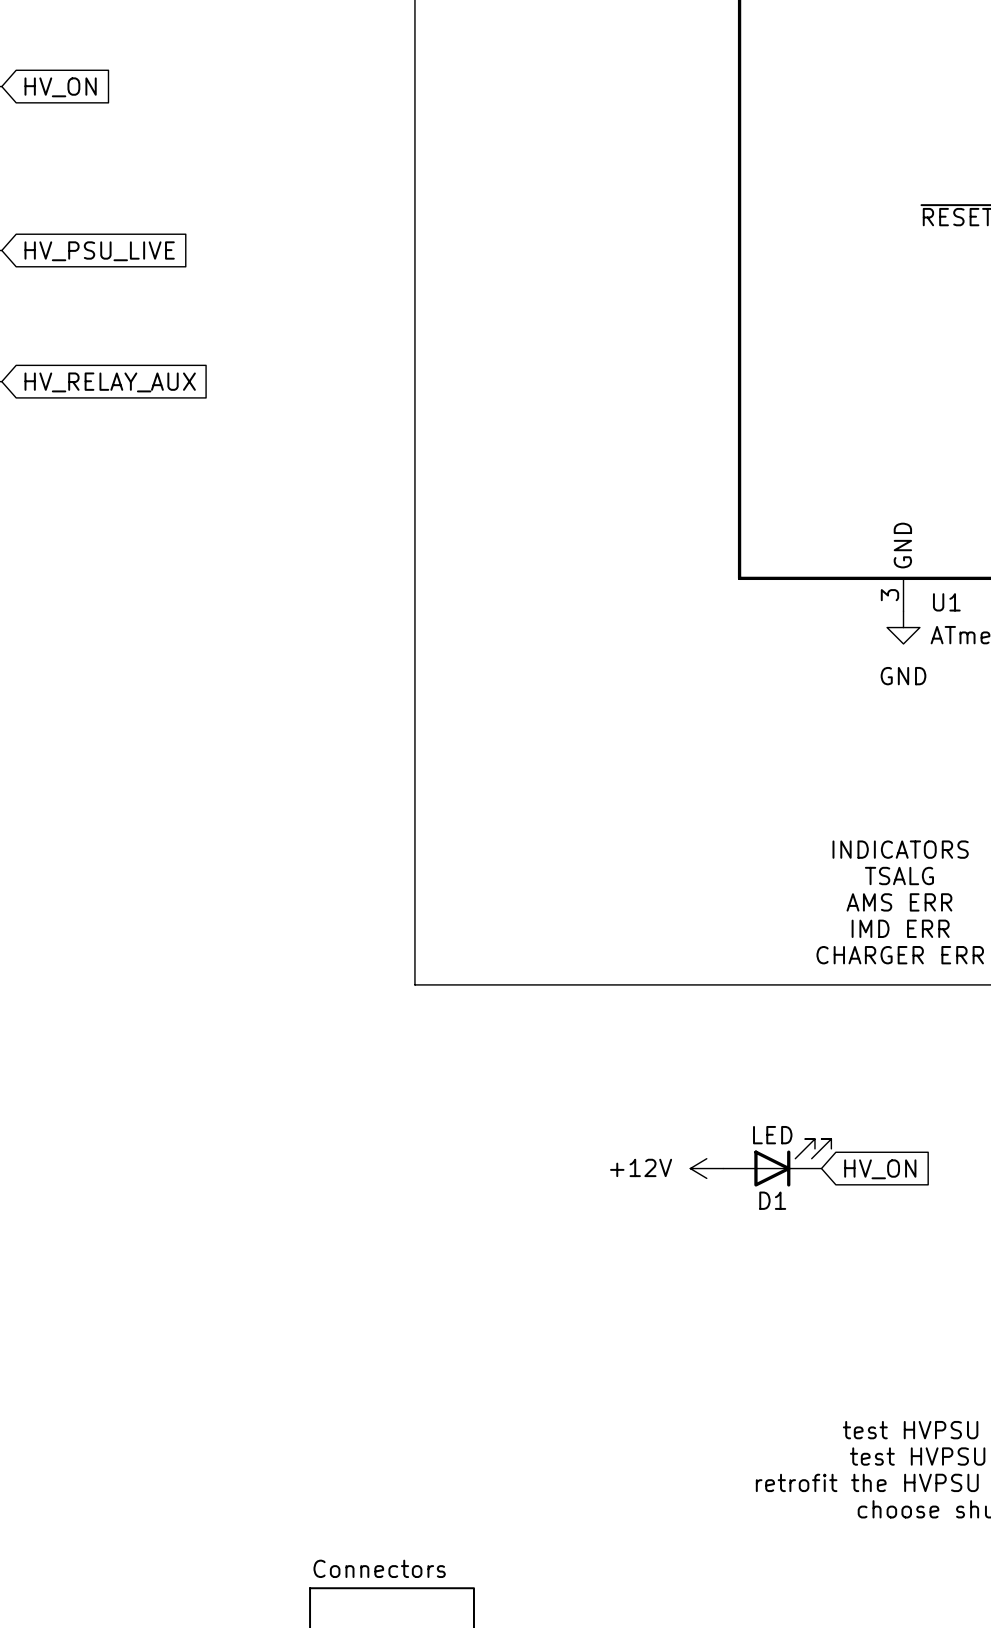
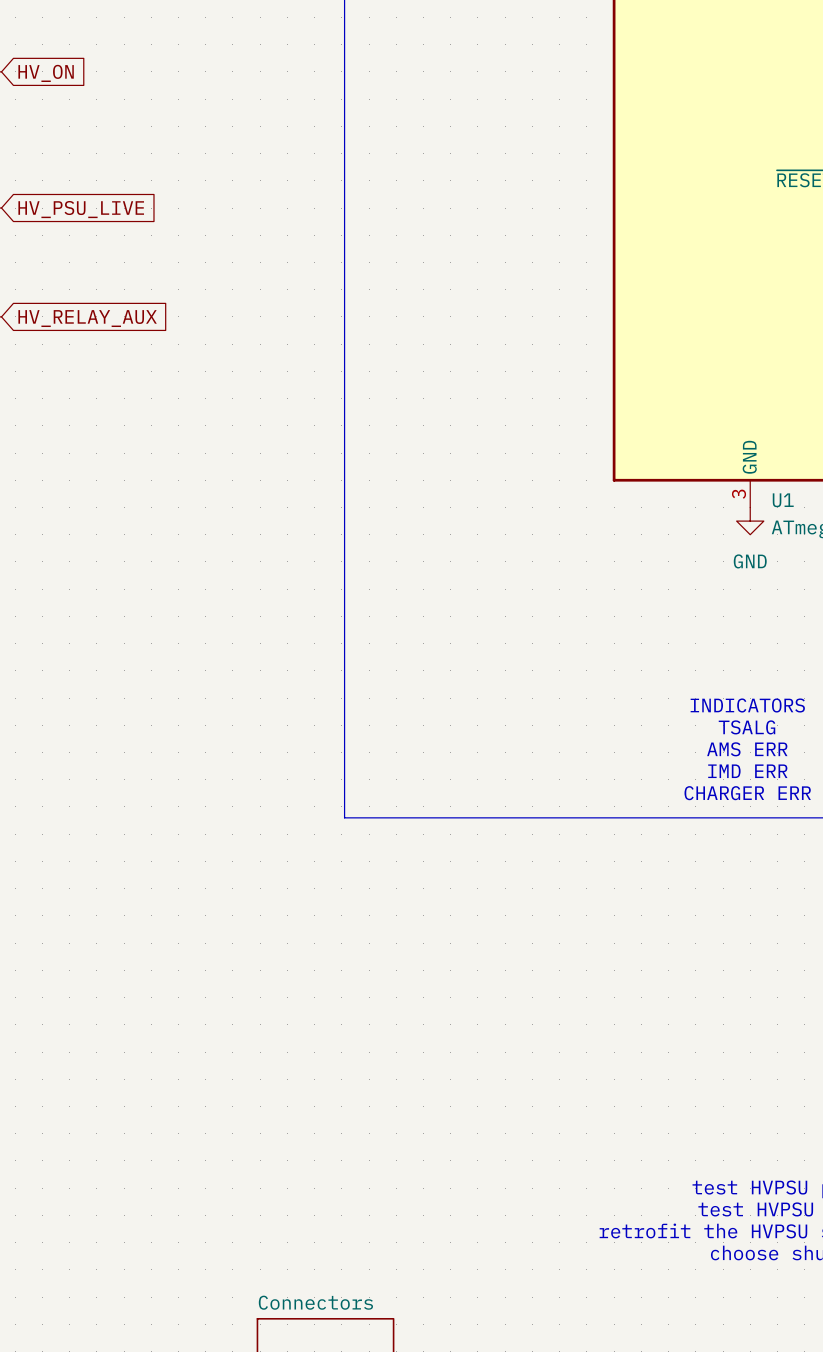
D1: LED (777, 1162) -> none
power symbol: +12V (706, 1168) -> none
global label: HV_ON (880, 1169) -> none

